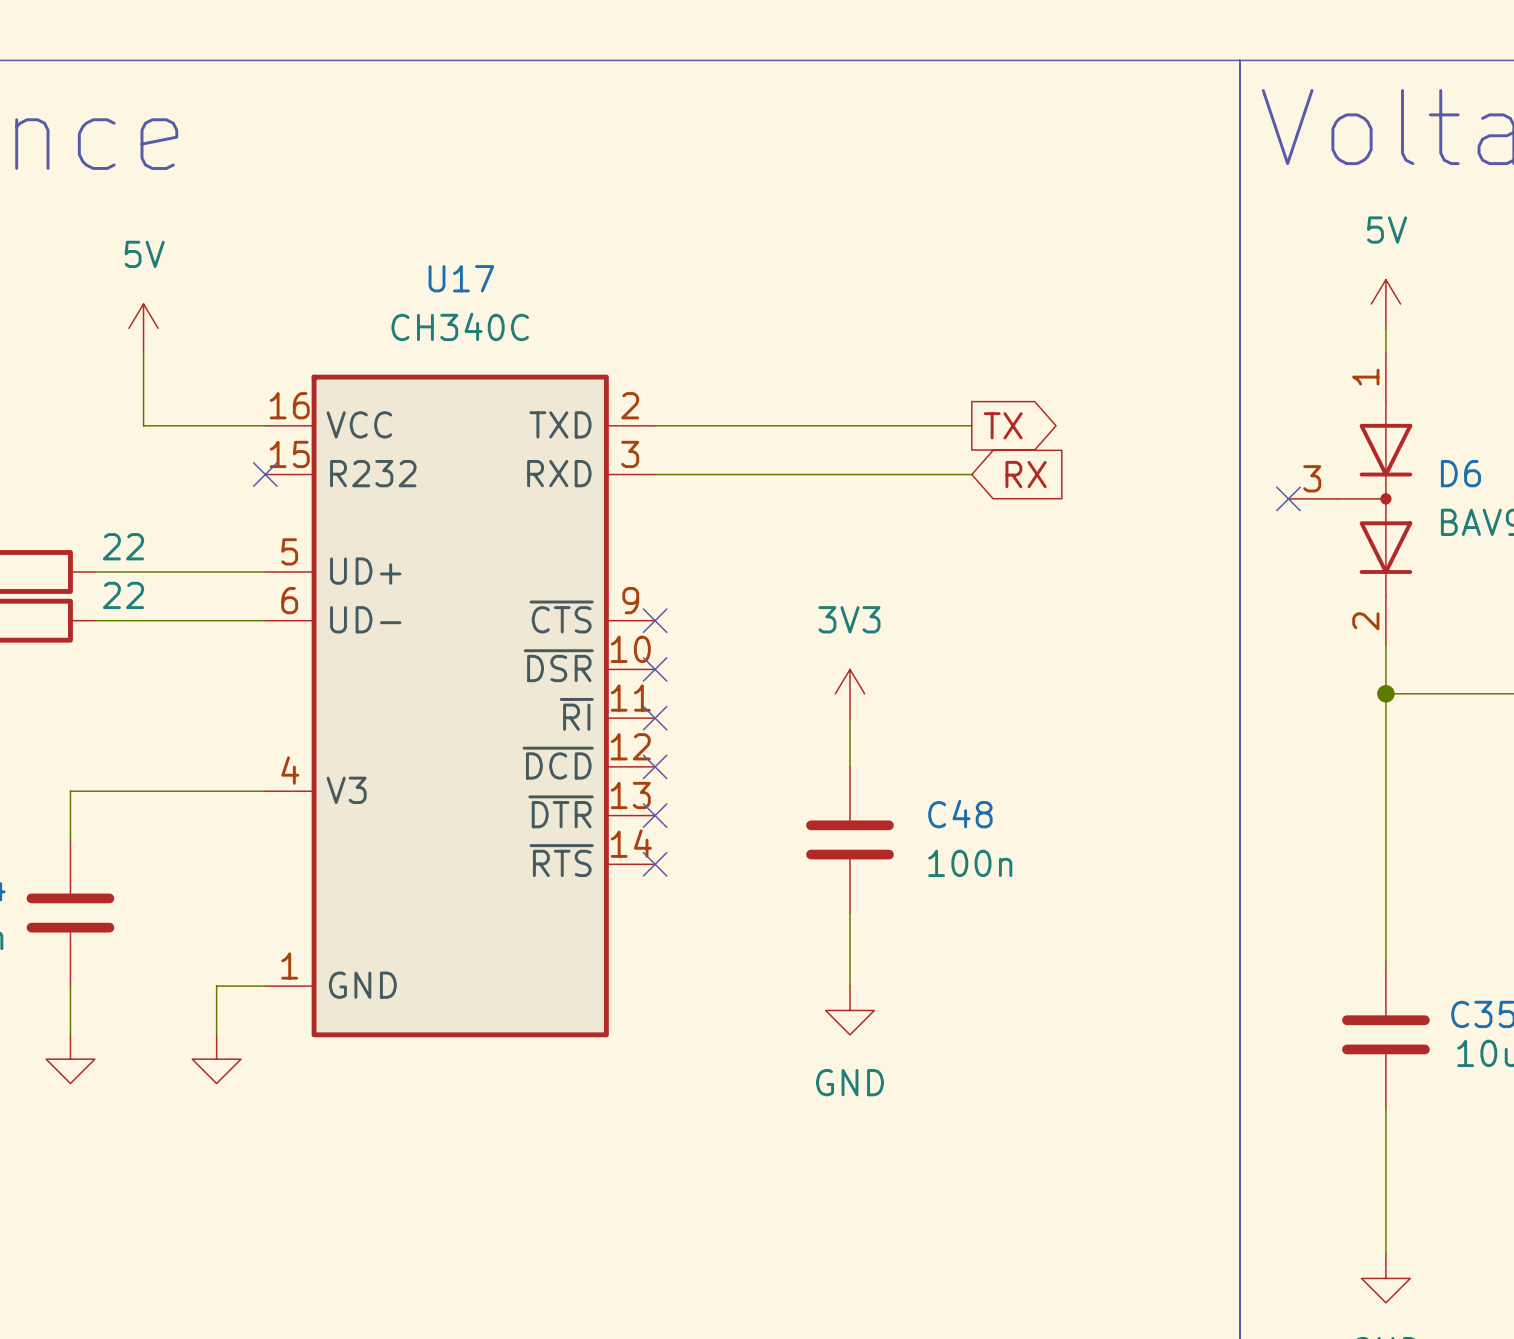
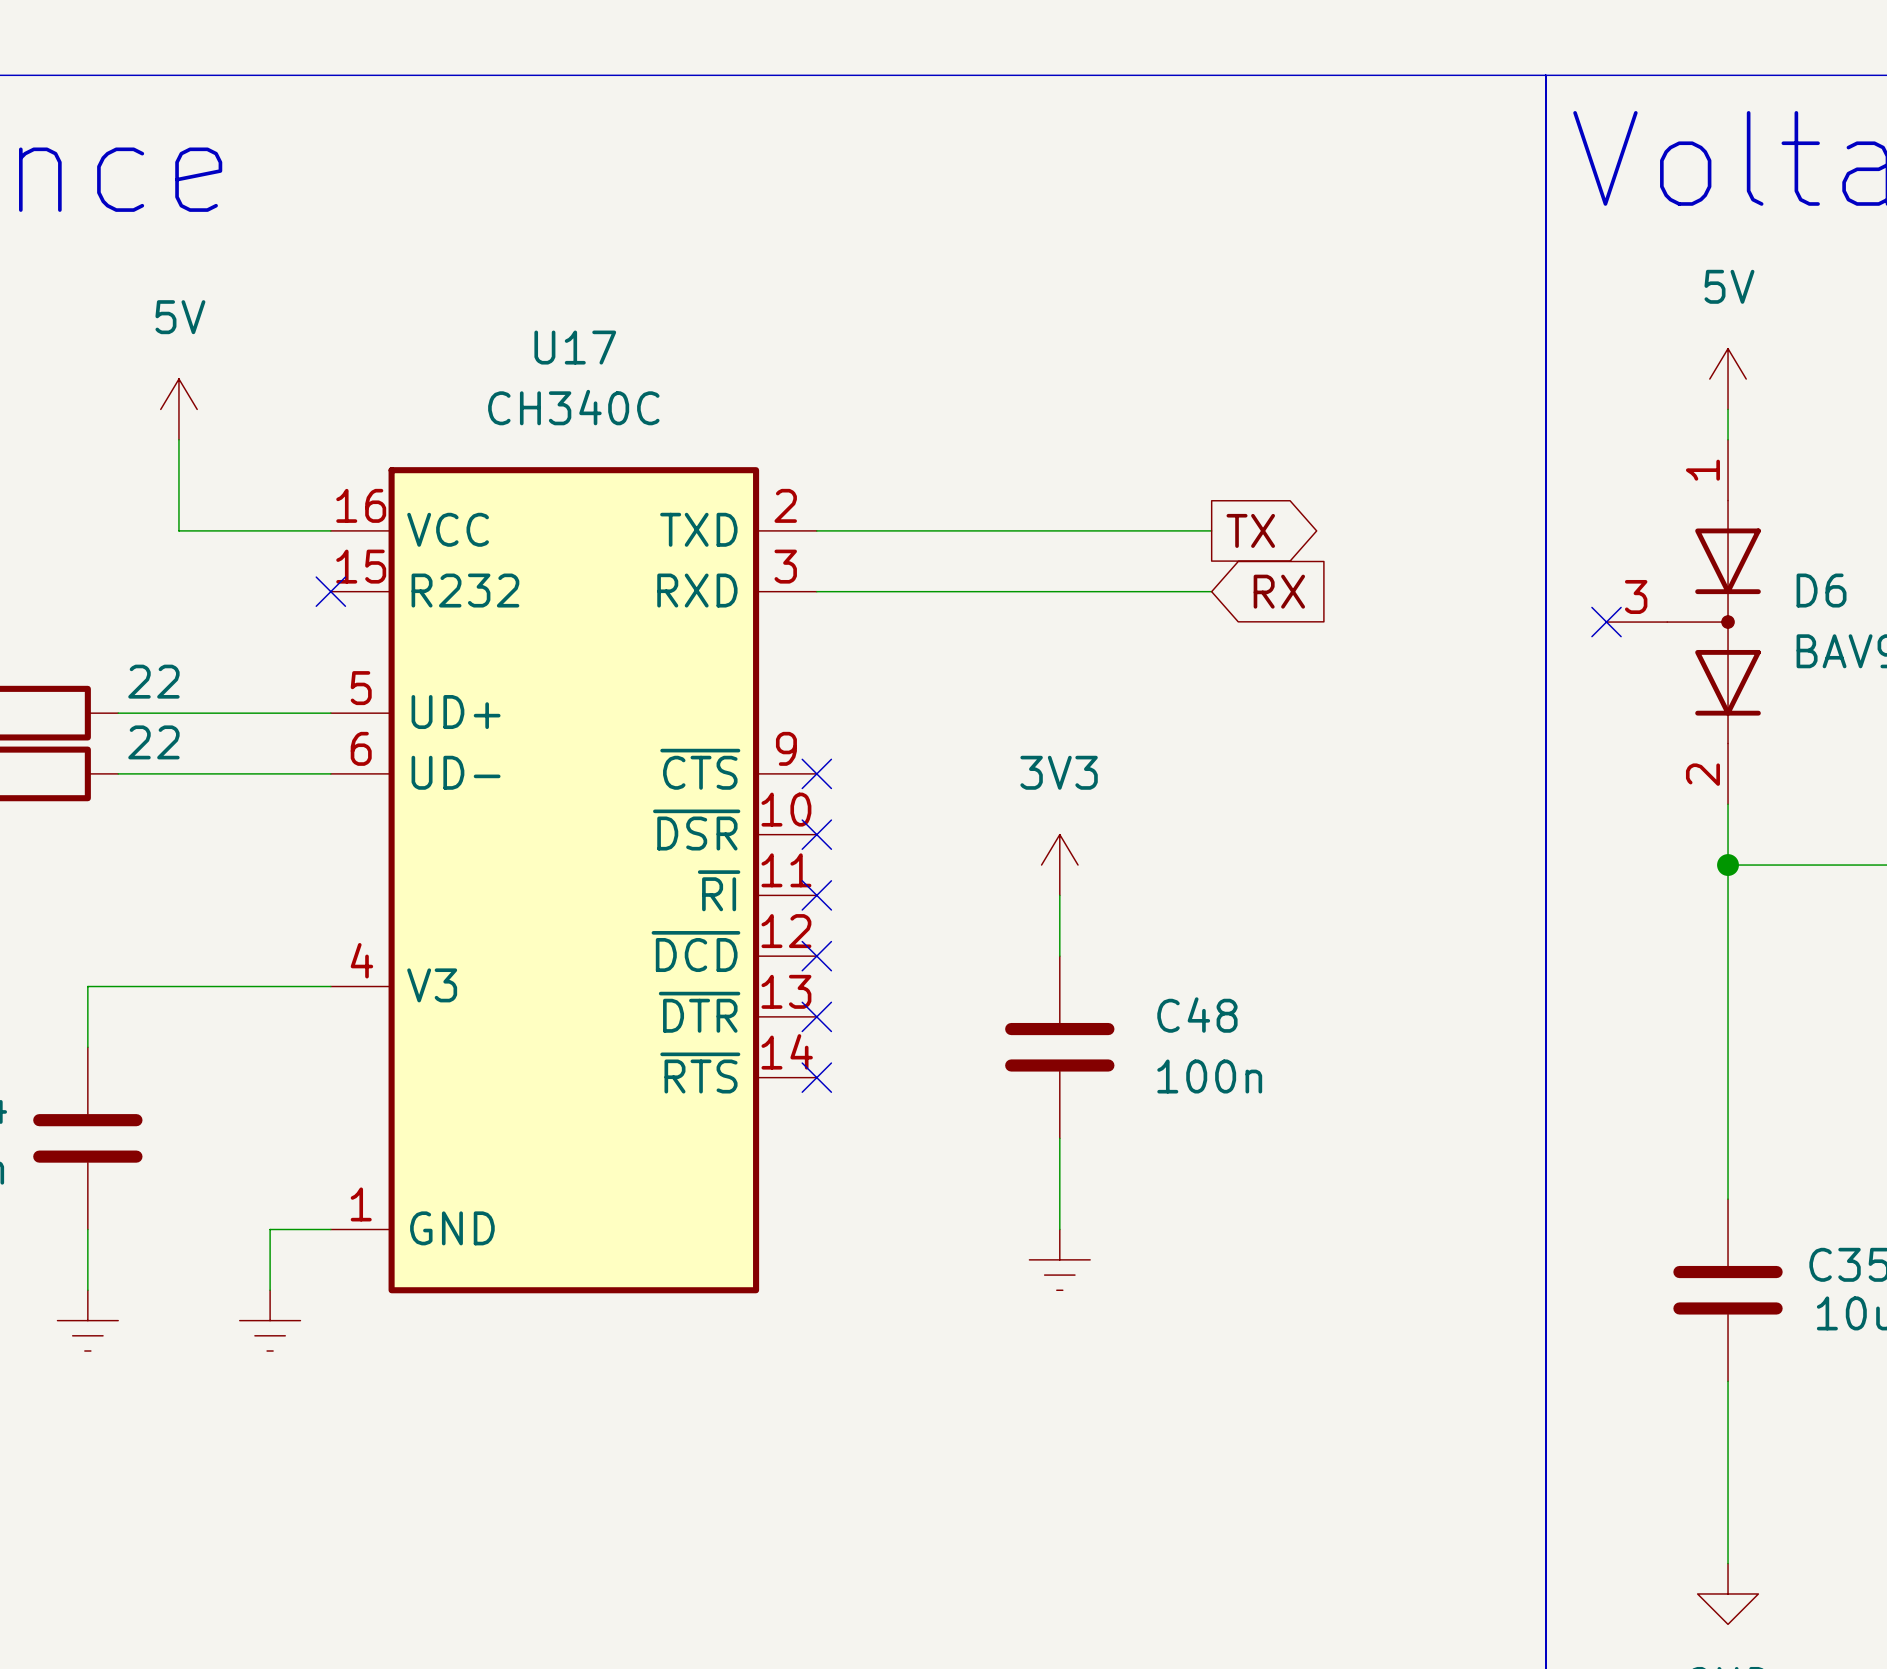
power symbol shape: [825, 986, 875, 1035] -> [1029, 1229, 1091, 1291]
power symbol shape: [46, 1034, 95, 1084] -> [57, 1290, 119, 1352]
power symbol shape: [192, 1034, 241, 1084] -> [239, 1290, 301, 1352]
power symbol text: GND (850, 1082) -> none

